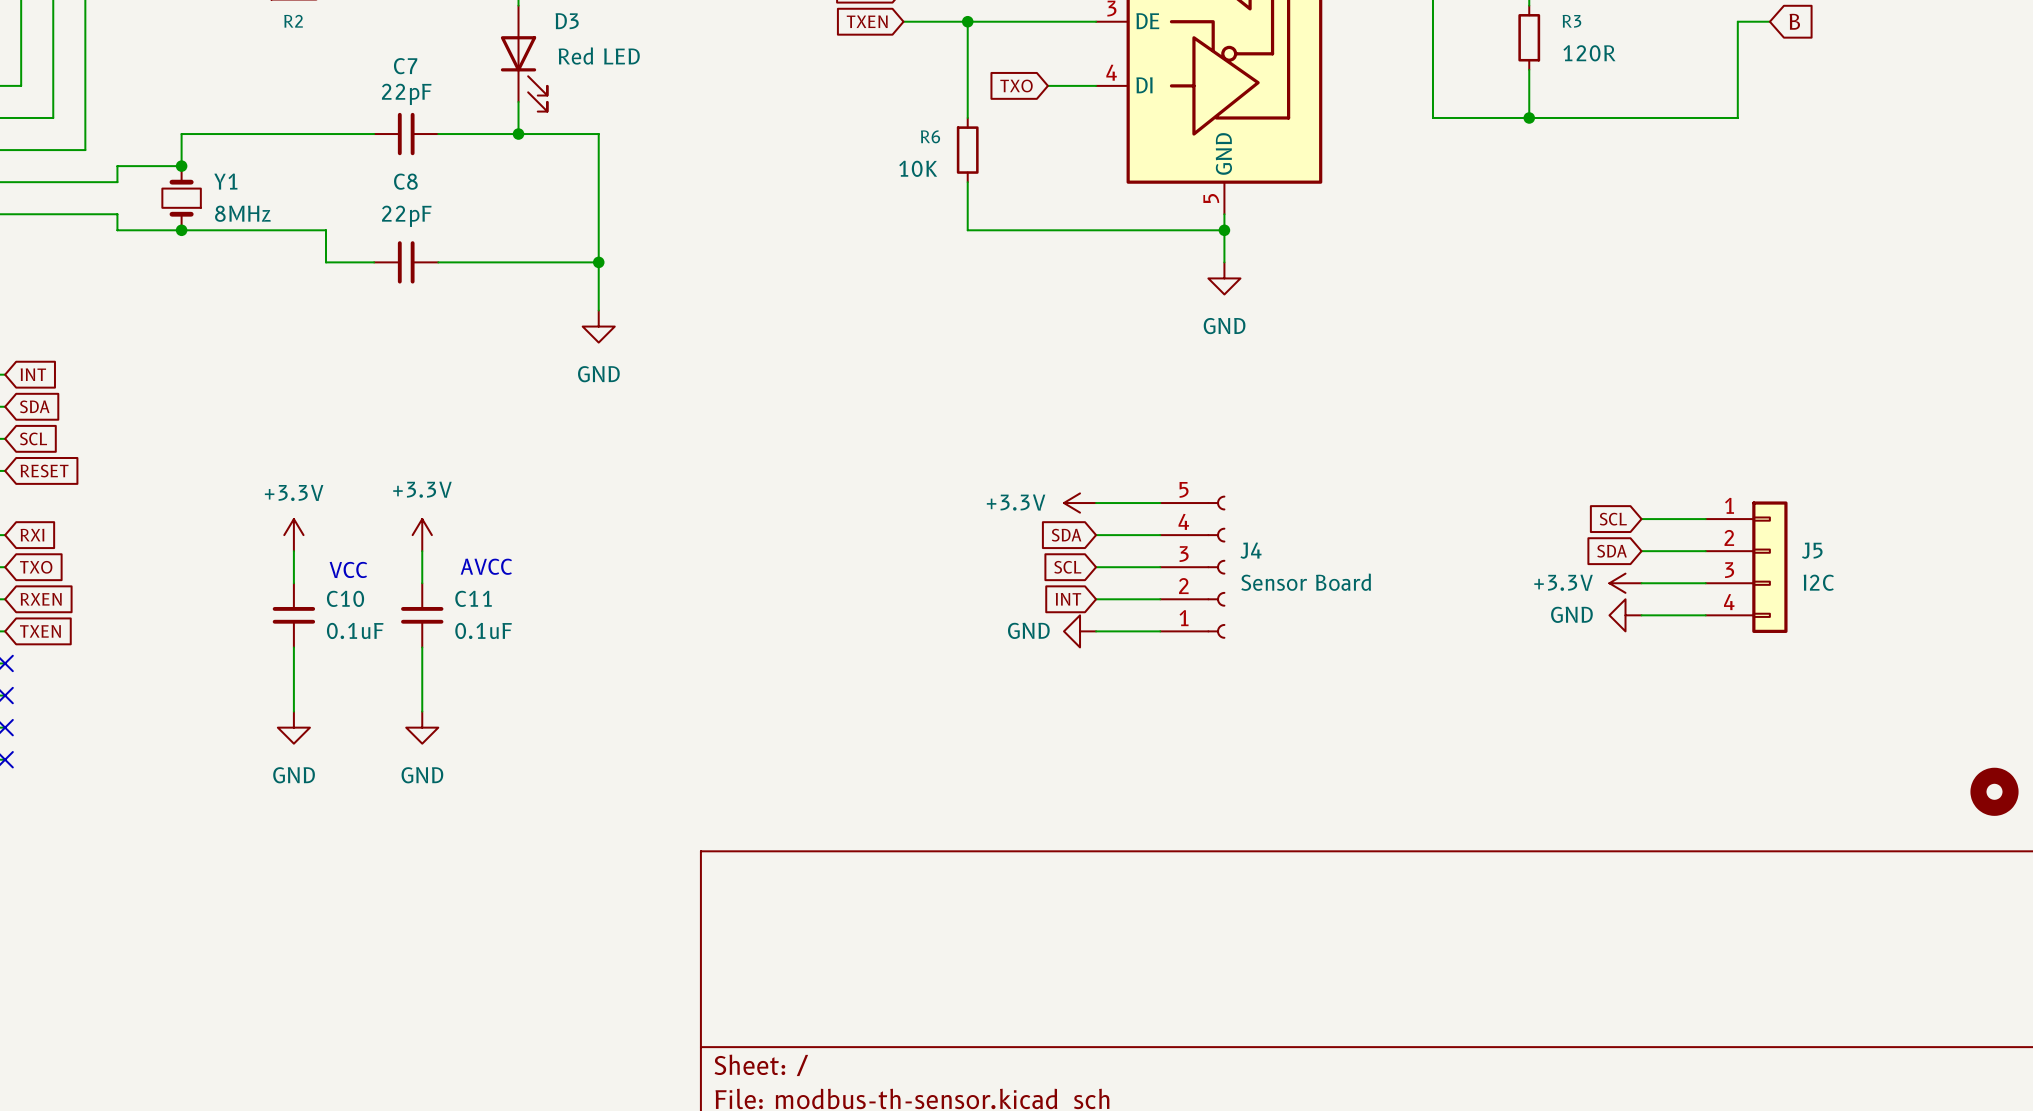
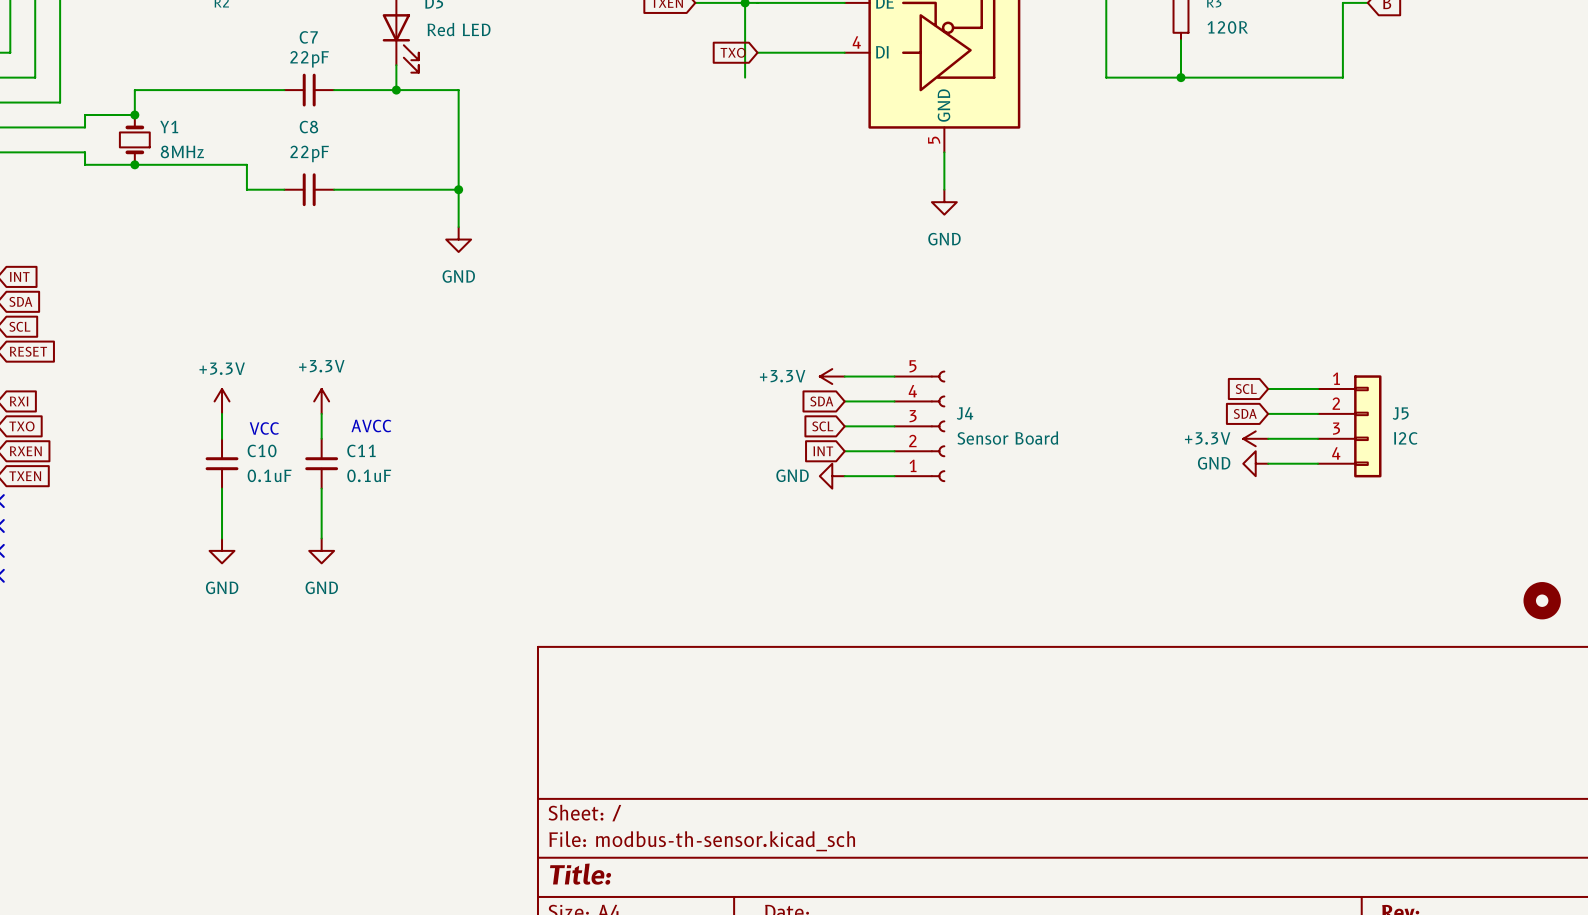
wire: none -> (757, 52) (807, 52)
global label position: TXO (1016, 85) -> TXO (733, 52)
R6: 10K (967, 150) -> none
wire: (967, 182) (967, 230) (1224, 230) -> none
junction: (1224, 230) -> none

